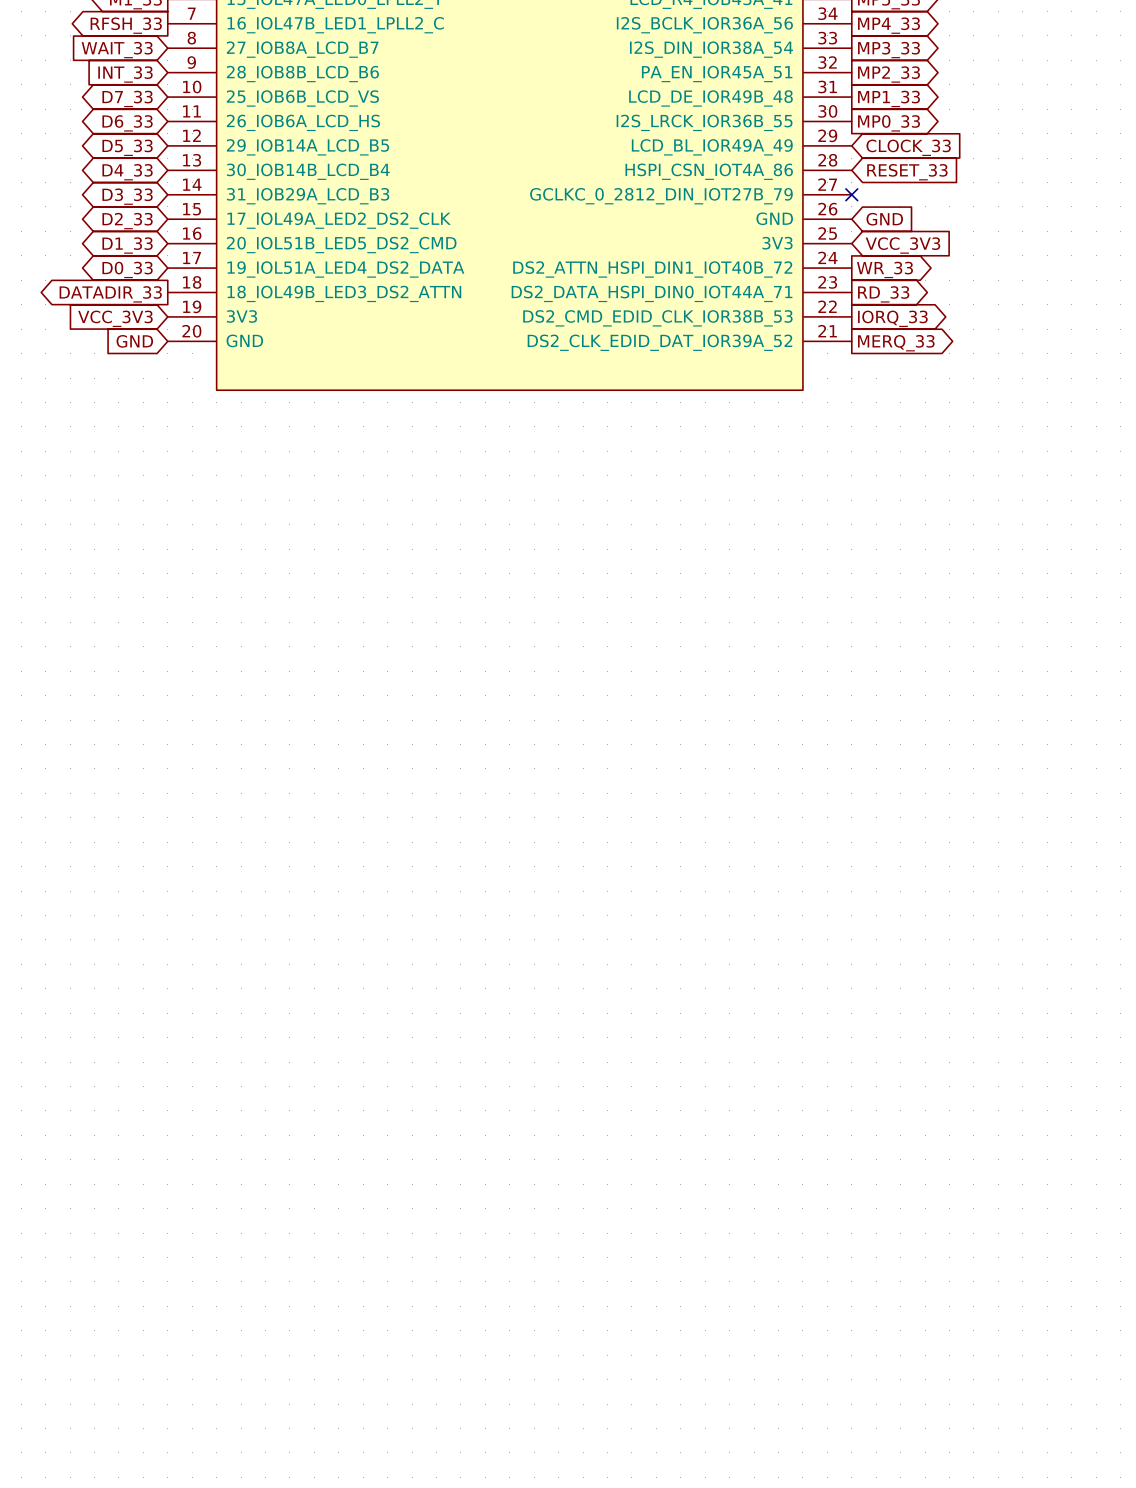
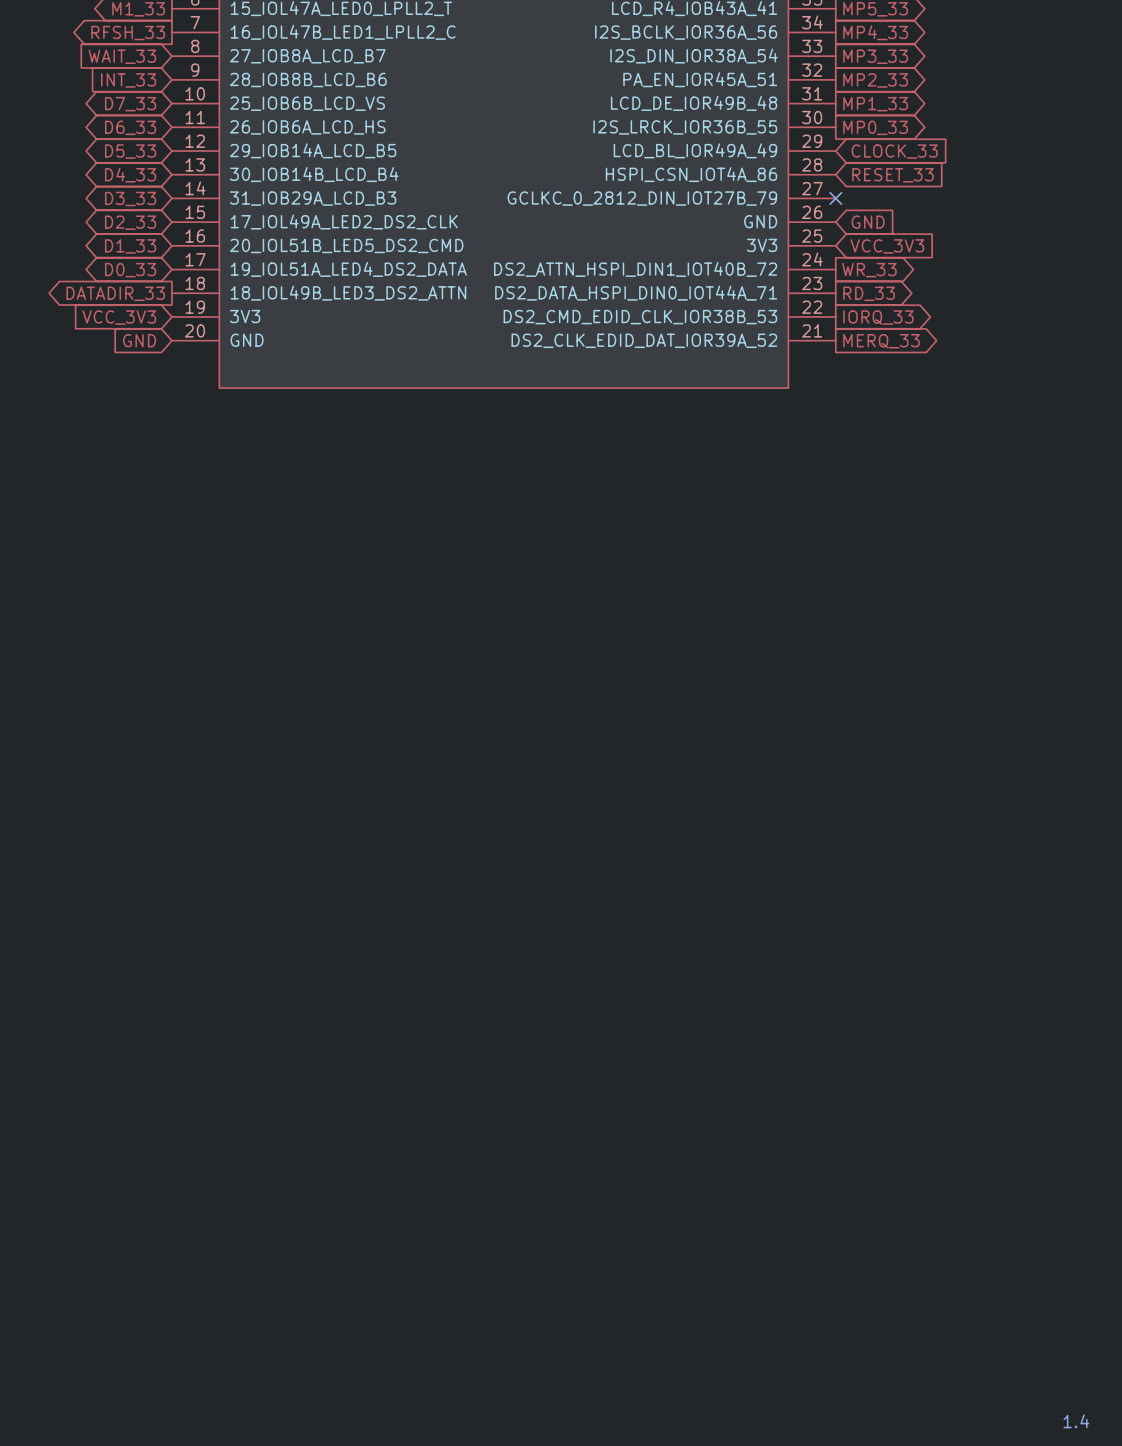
text: none -> 1.4 (1076, 1421)

